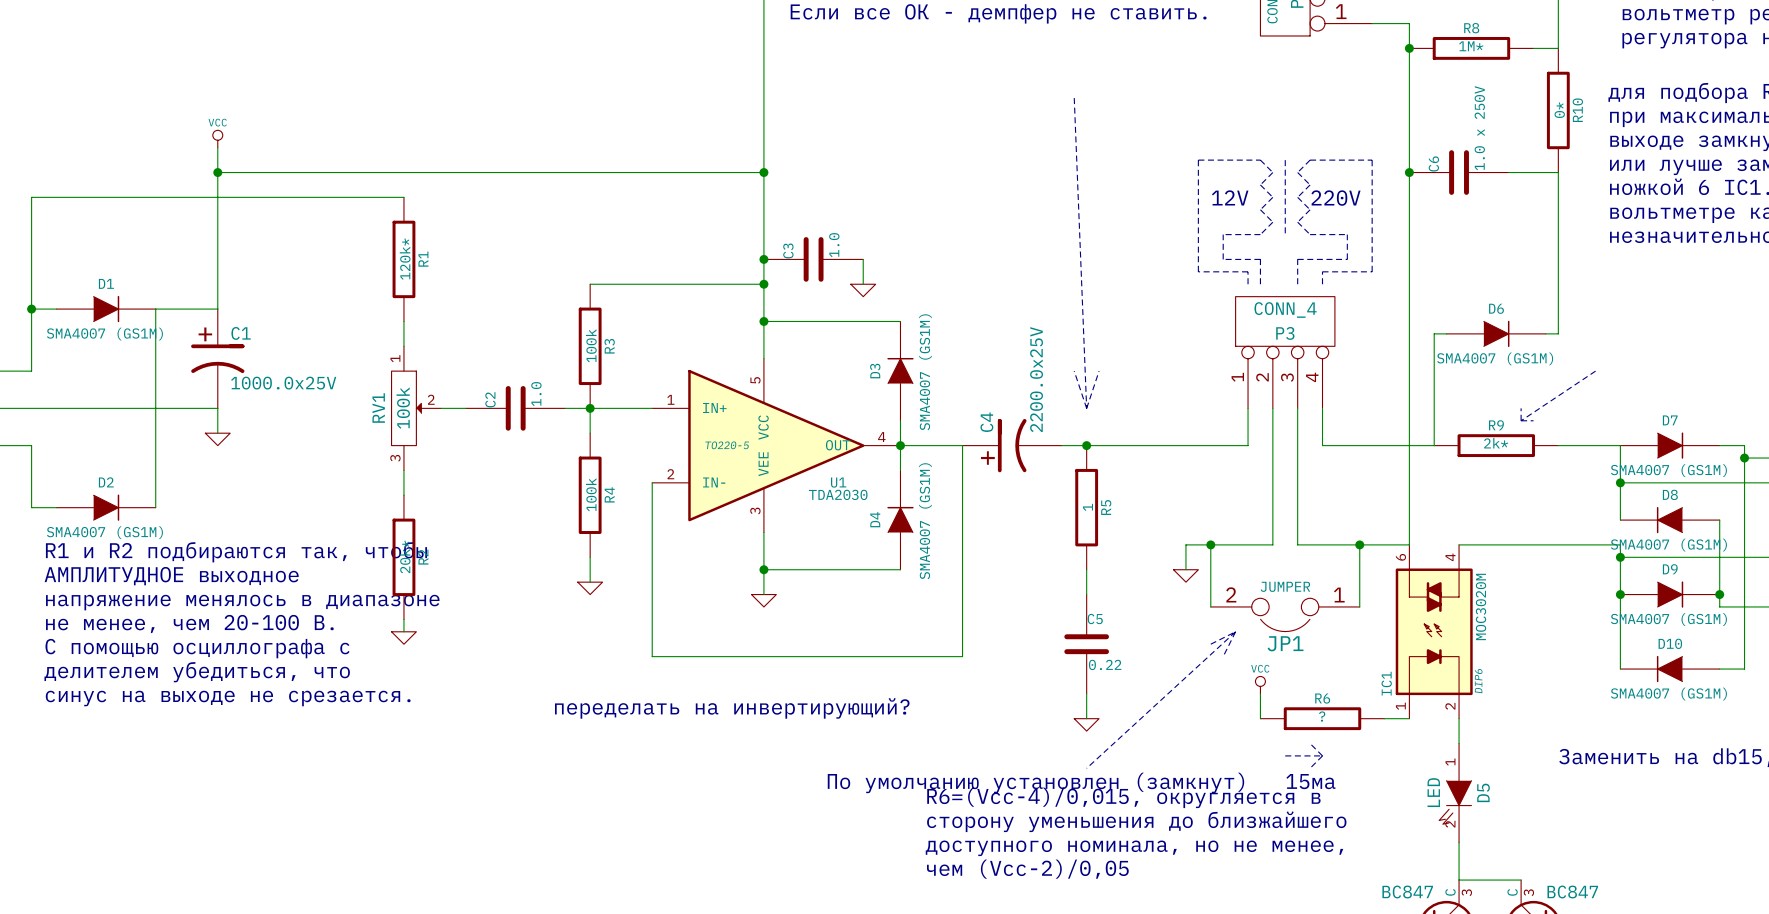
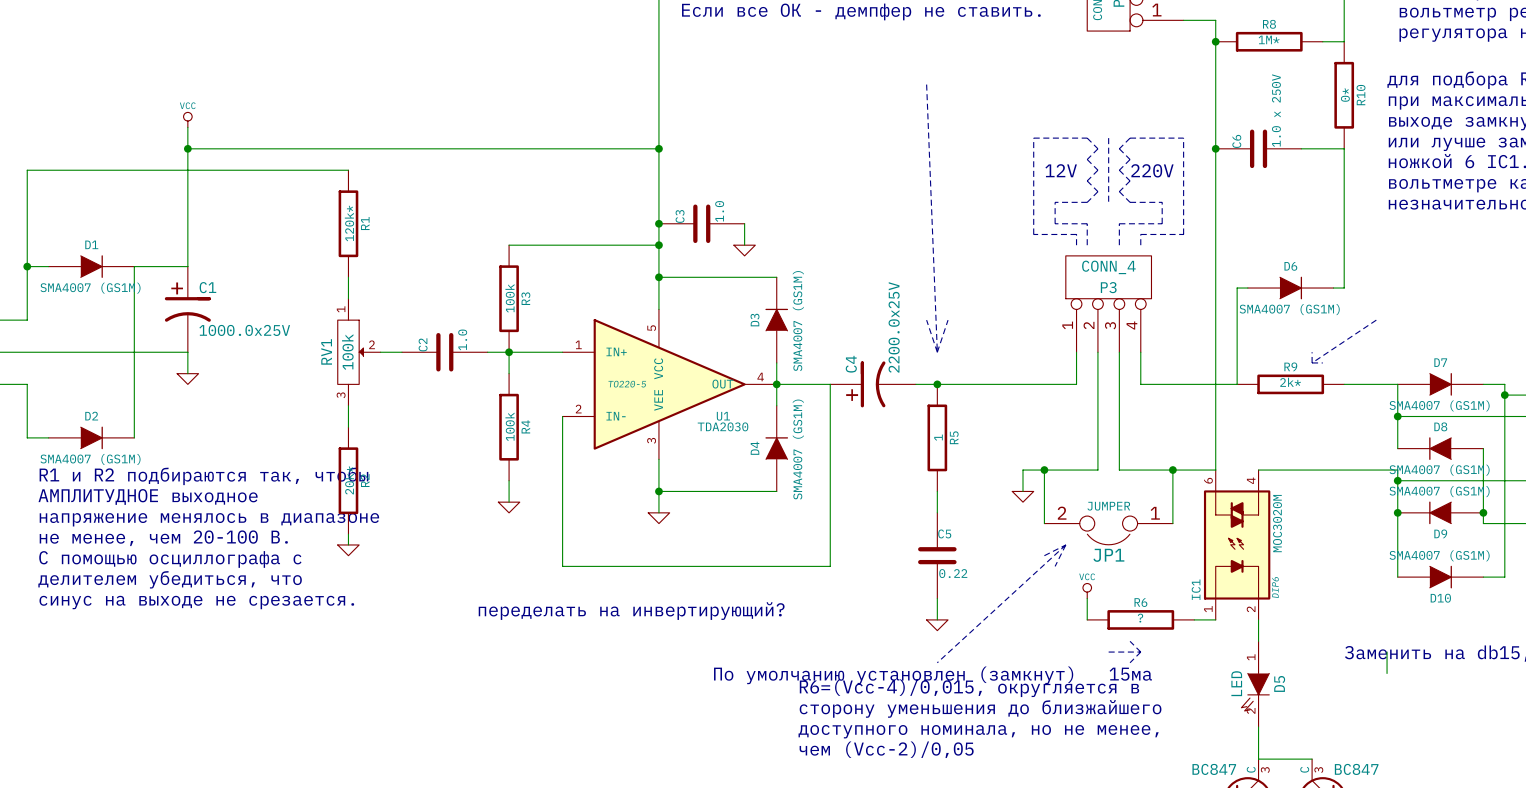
D9 rotation: 0° (1670, 594) -> 180° (1440, 512)
D10 rotation: 0° (1669, 669) -> 180° (1440, 577)
wire: none -> (1387, 652) (1387, 673)

